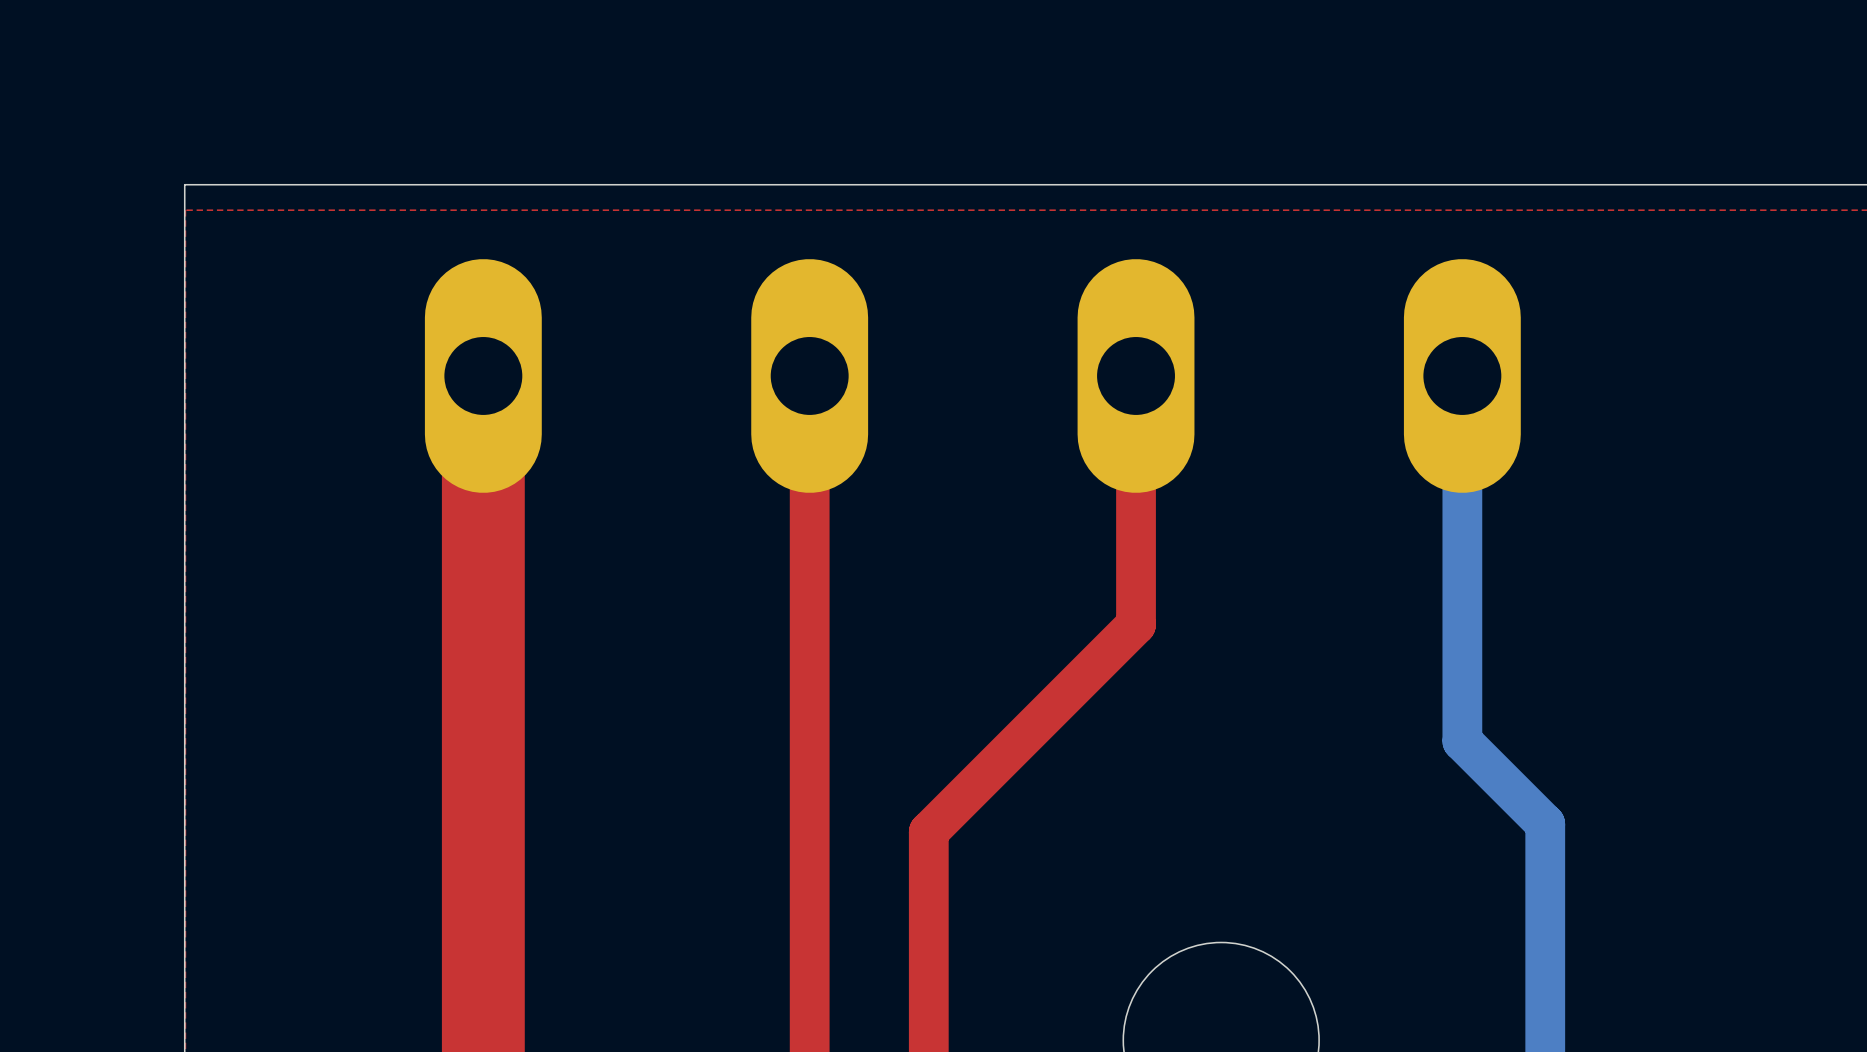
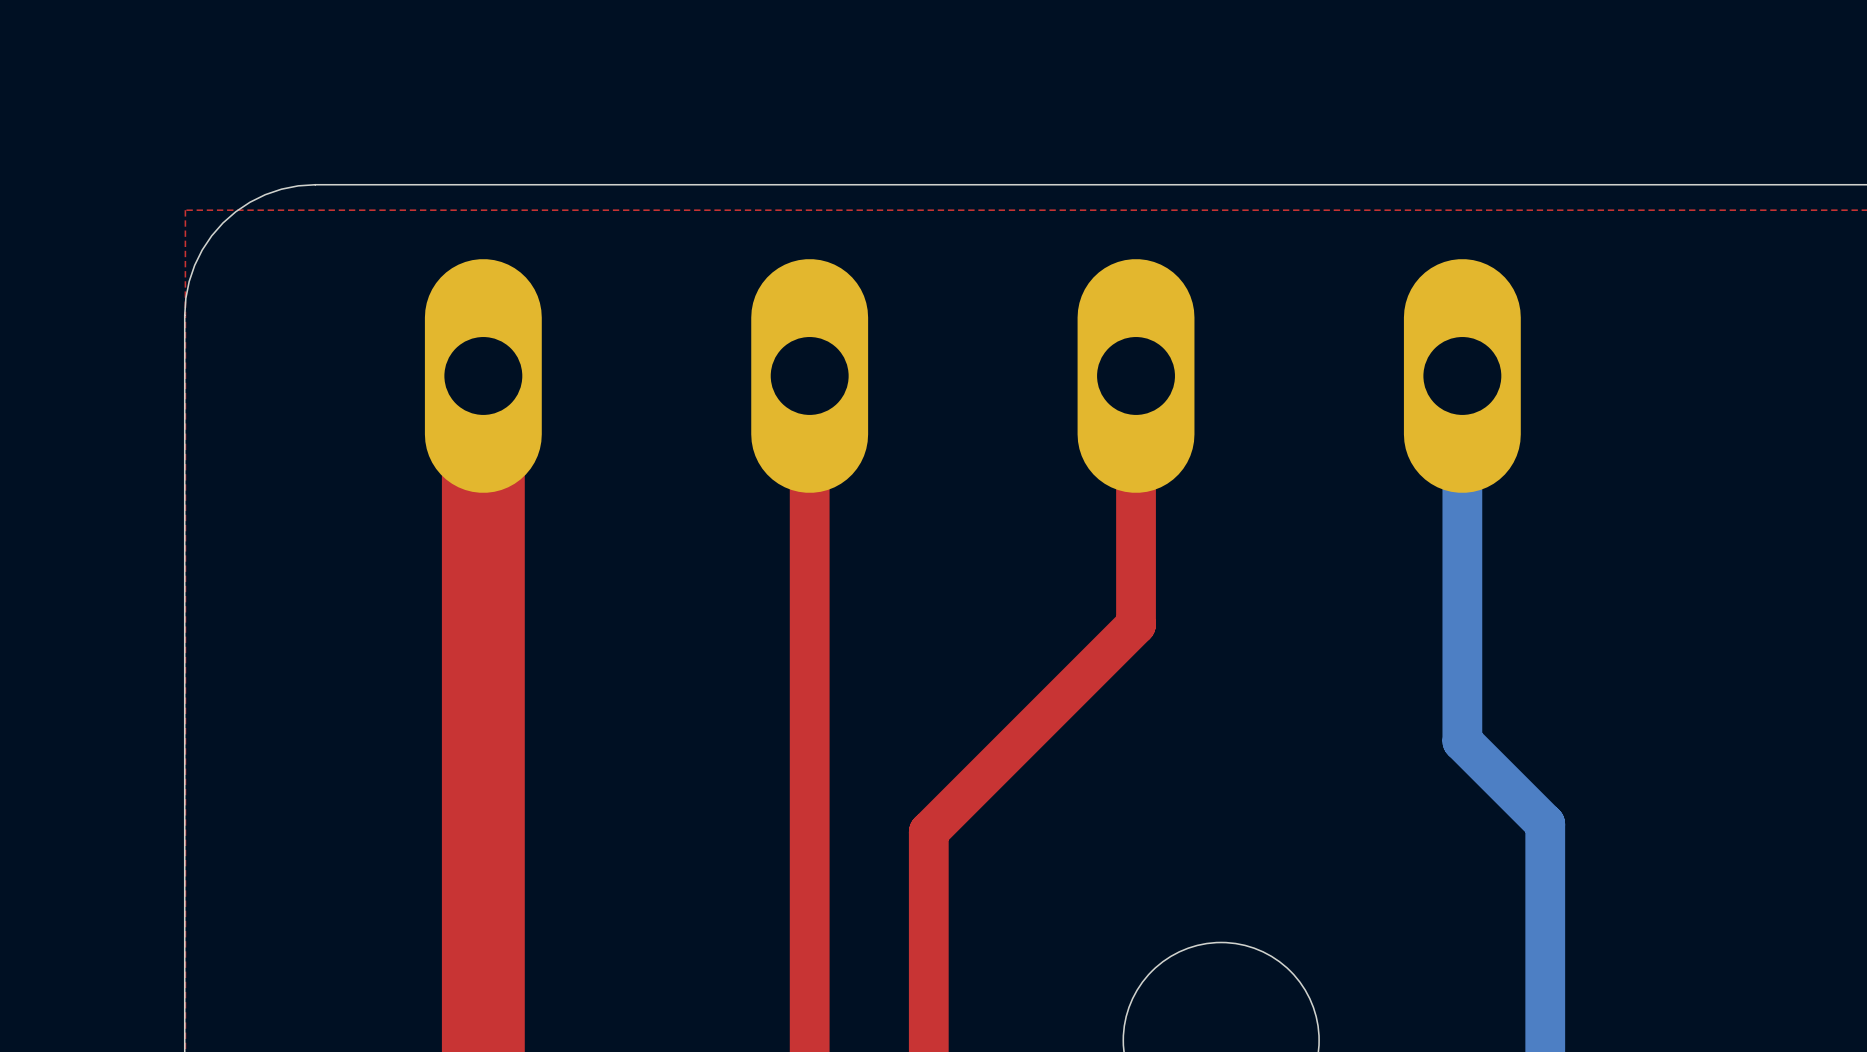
board edge: (315, 184) (184, 184) (184, 315) -> (315, 184) (281, 189) (265, 194) (250, 202) (222, 222) (202, 250) (194, 265) (189, 281) (184, 315)

